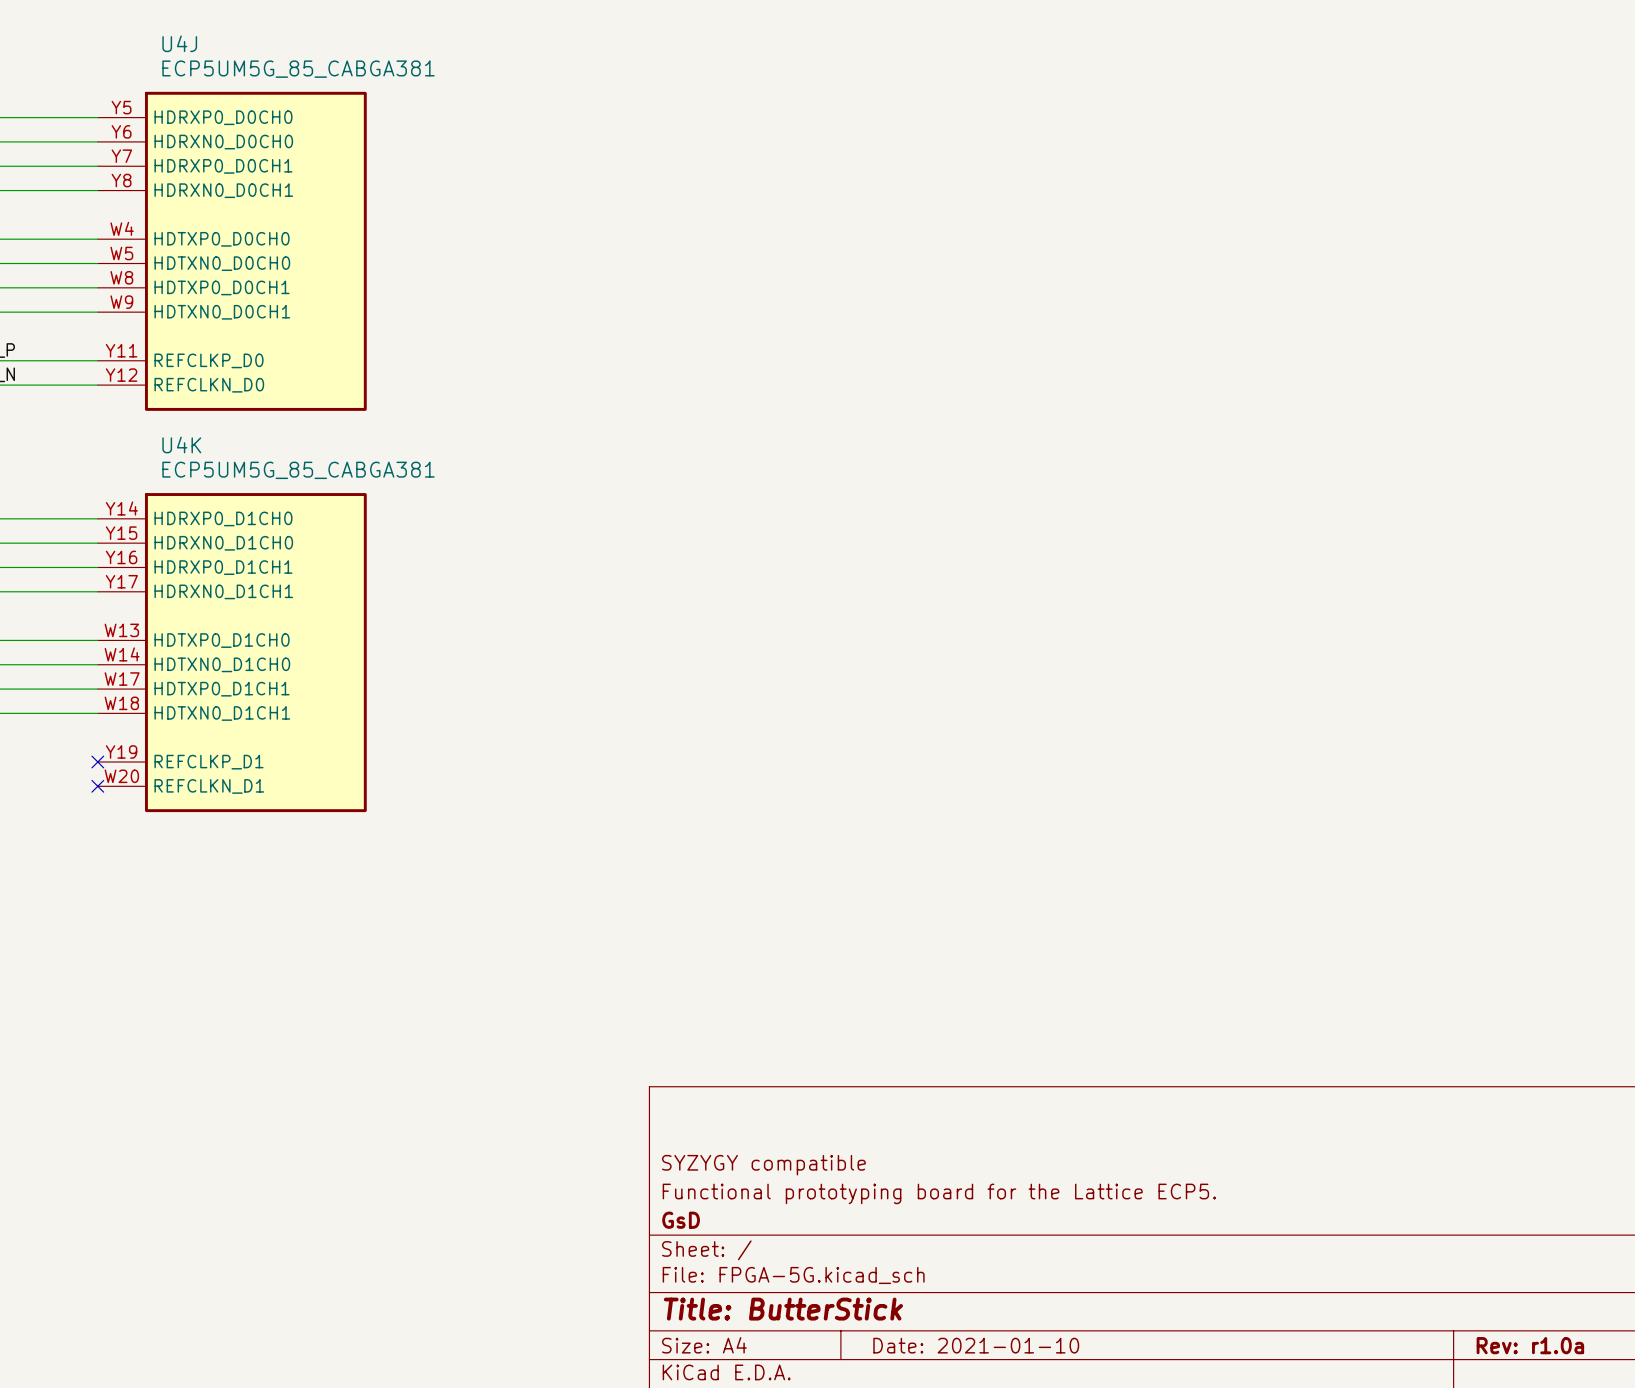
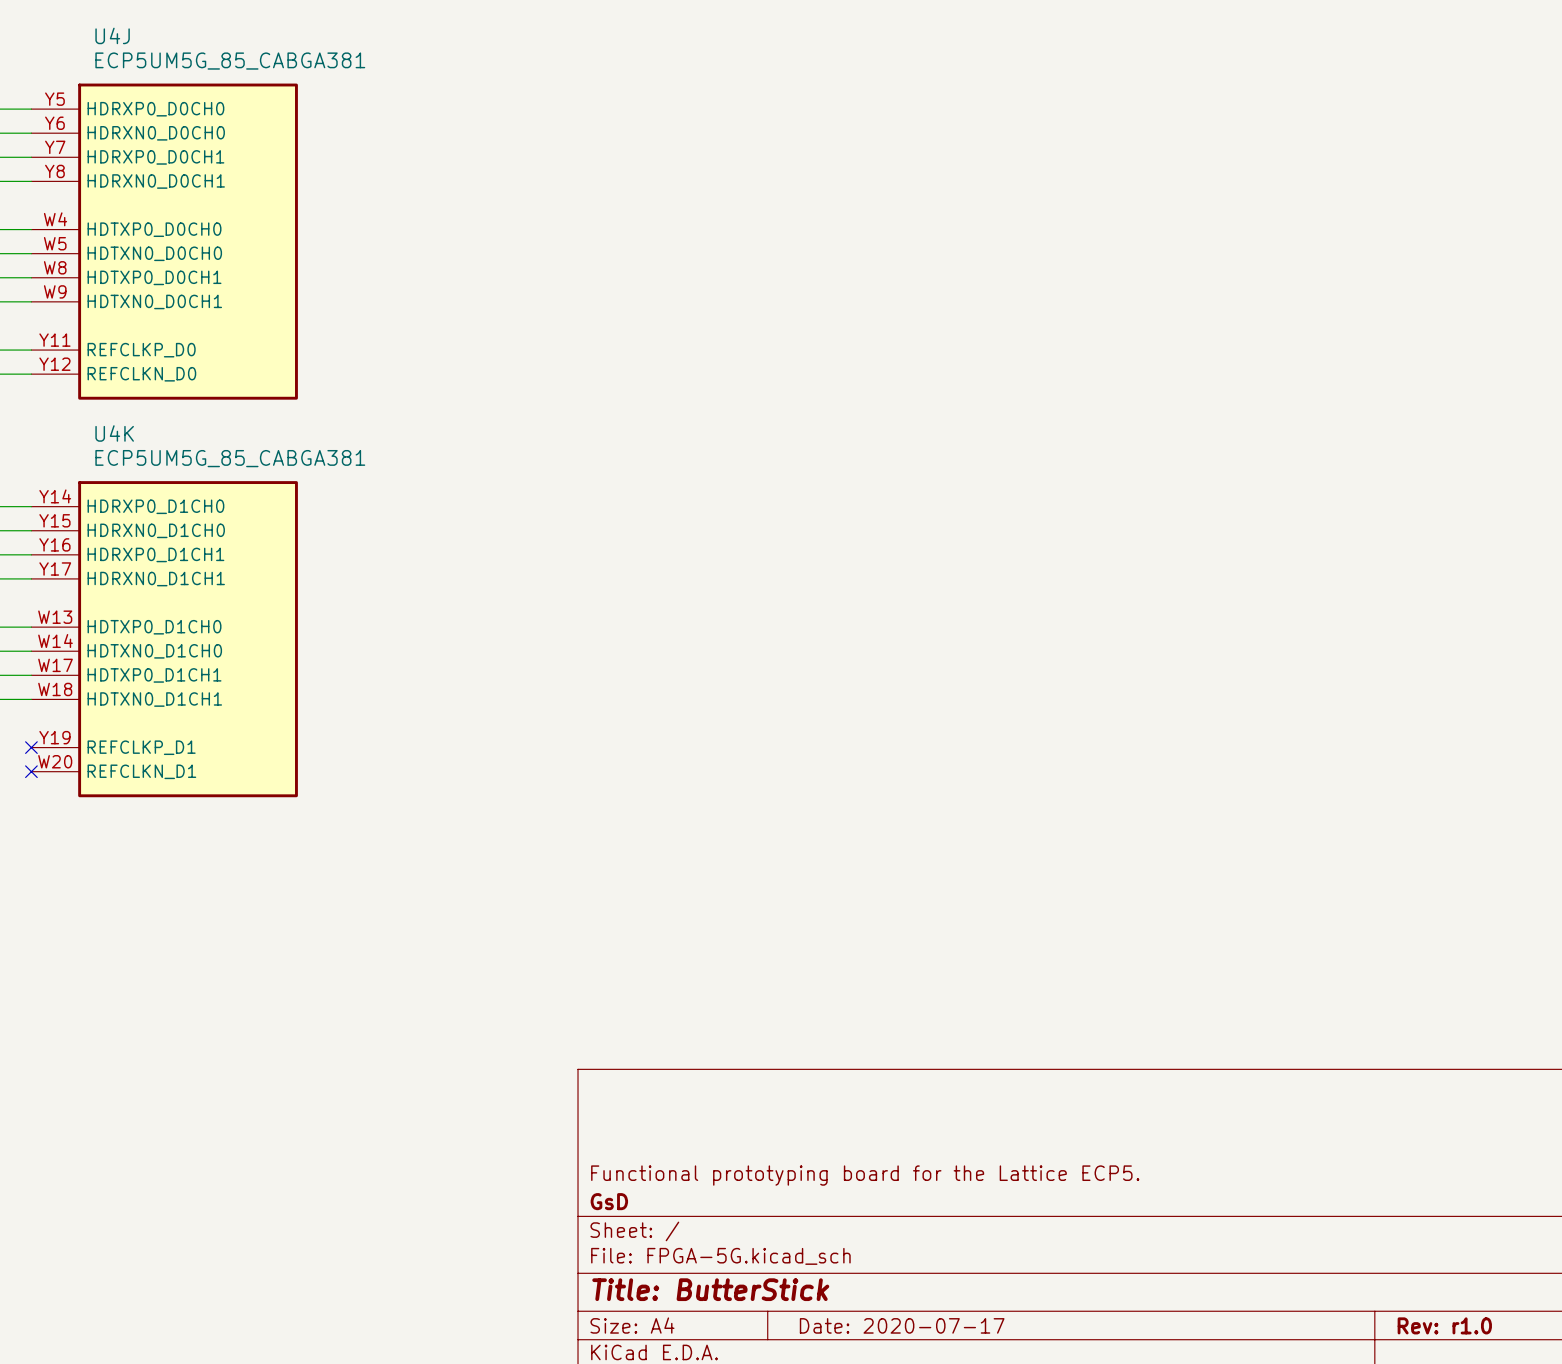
title block: SYZYGY compatible (763, 1165) -> none
title block: Date: 2021-01-10 (976, 1345) -> Date: 2020-07-17 (902, 1325)
title block: Rev: r1.0a (1530, 1345) -> Rev: r1.0 (1444, 1325)

